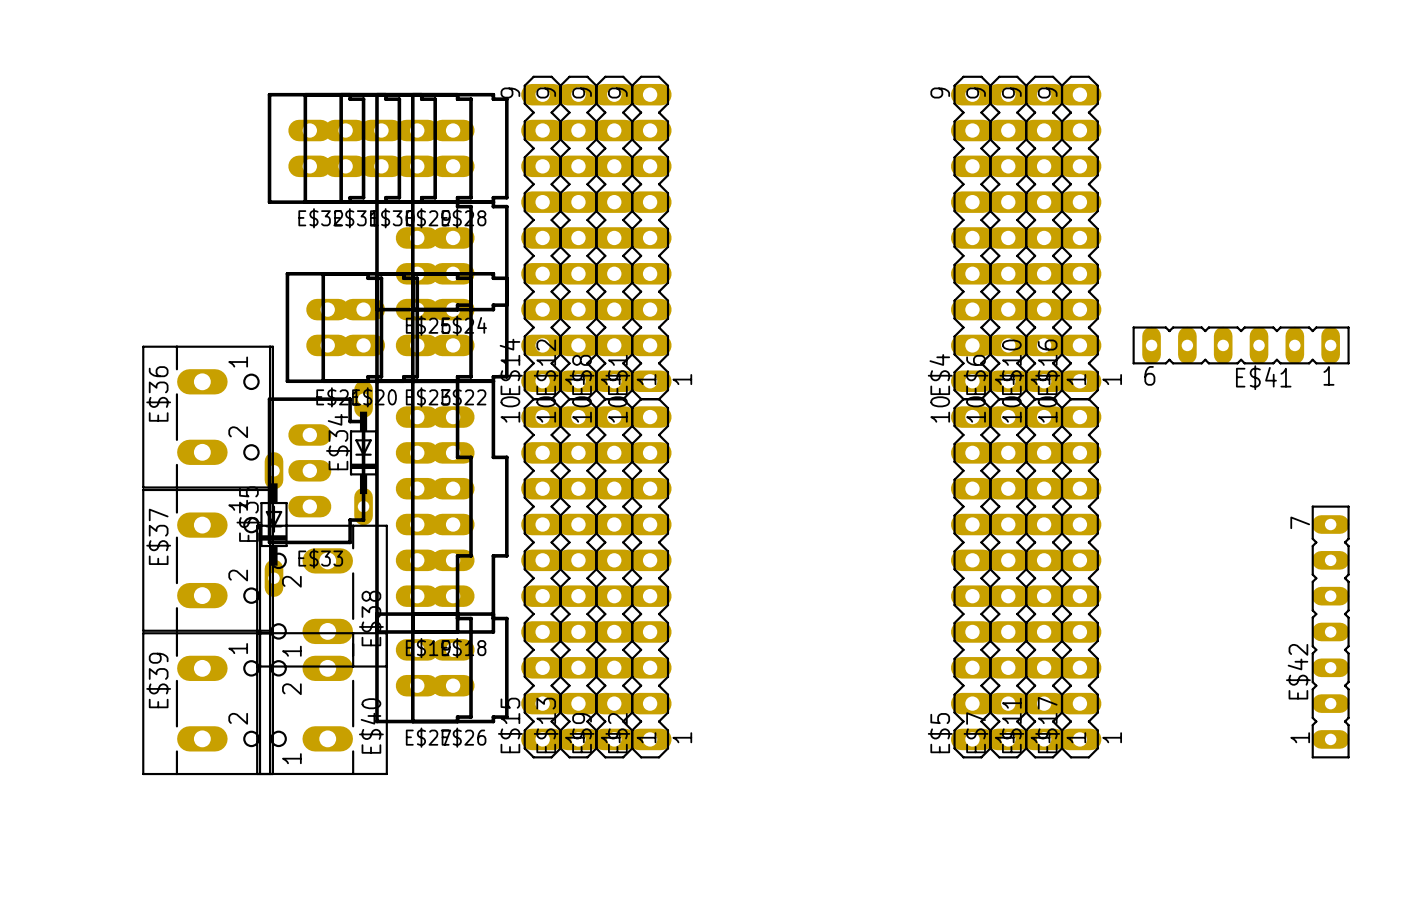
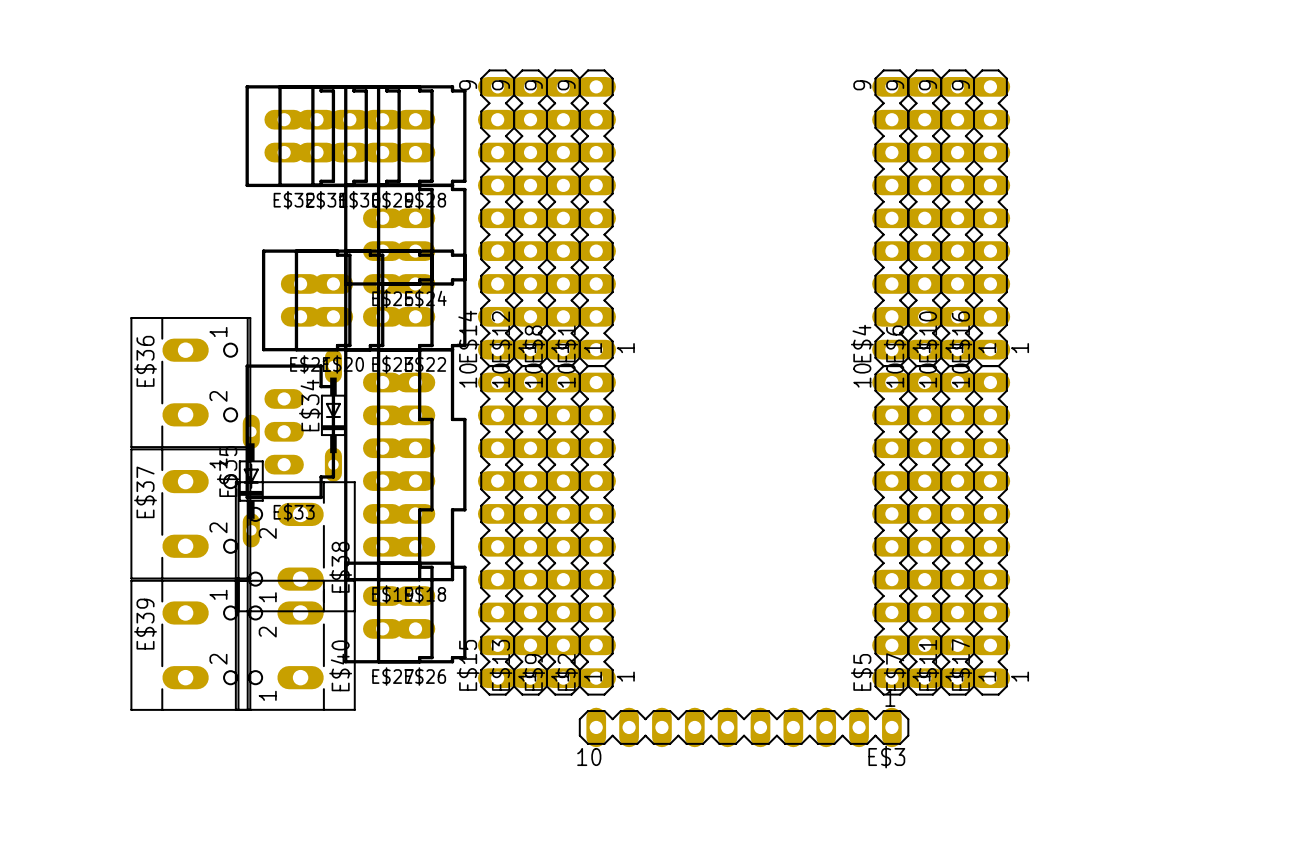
E$41: (1241, 345) -> none
E$42: (1330, 631) -> none
E$3: none -> (744, 727)

